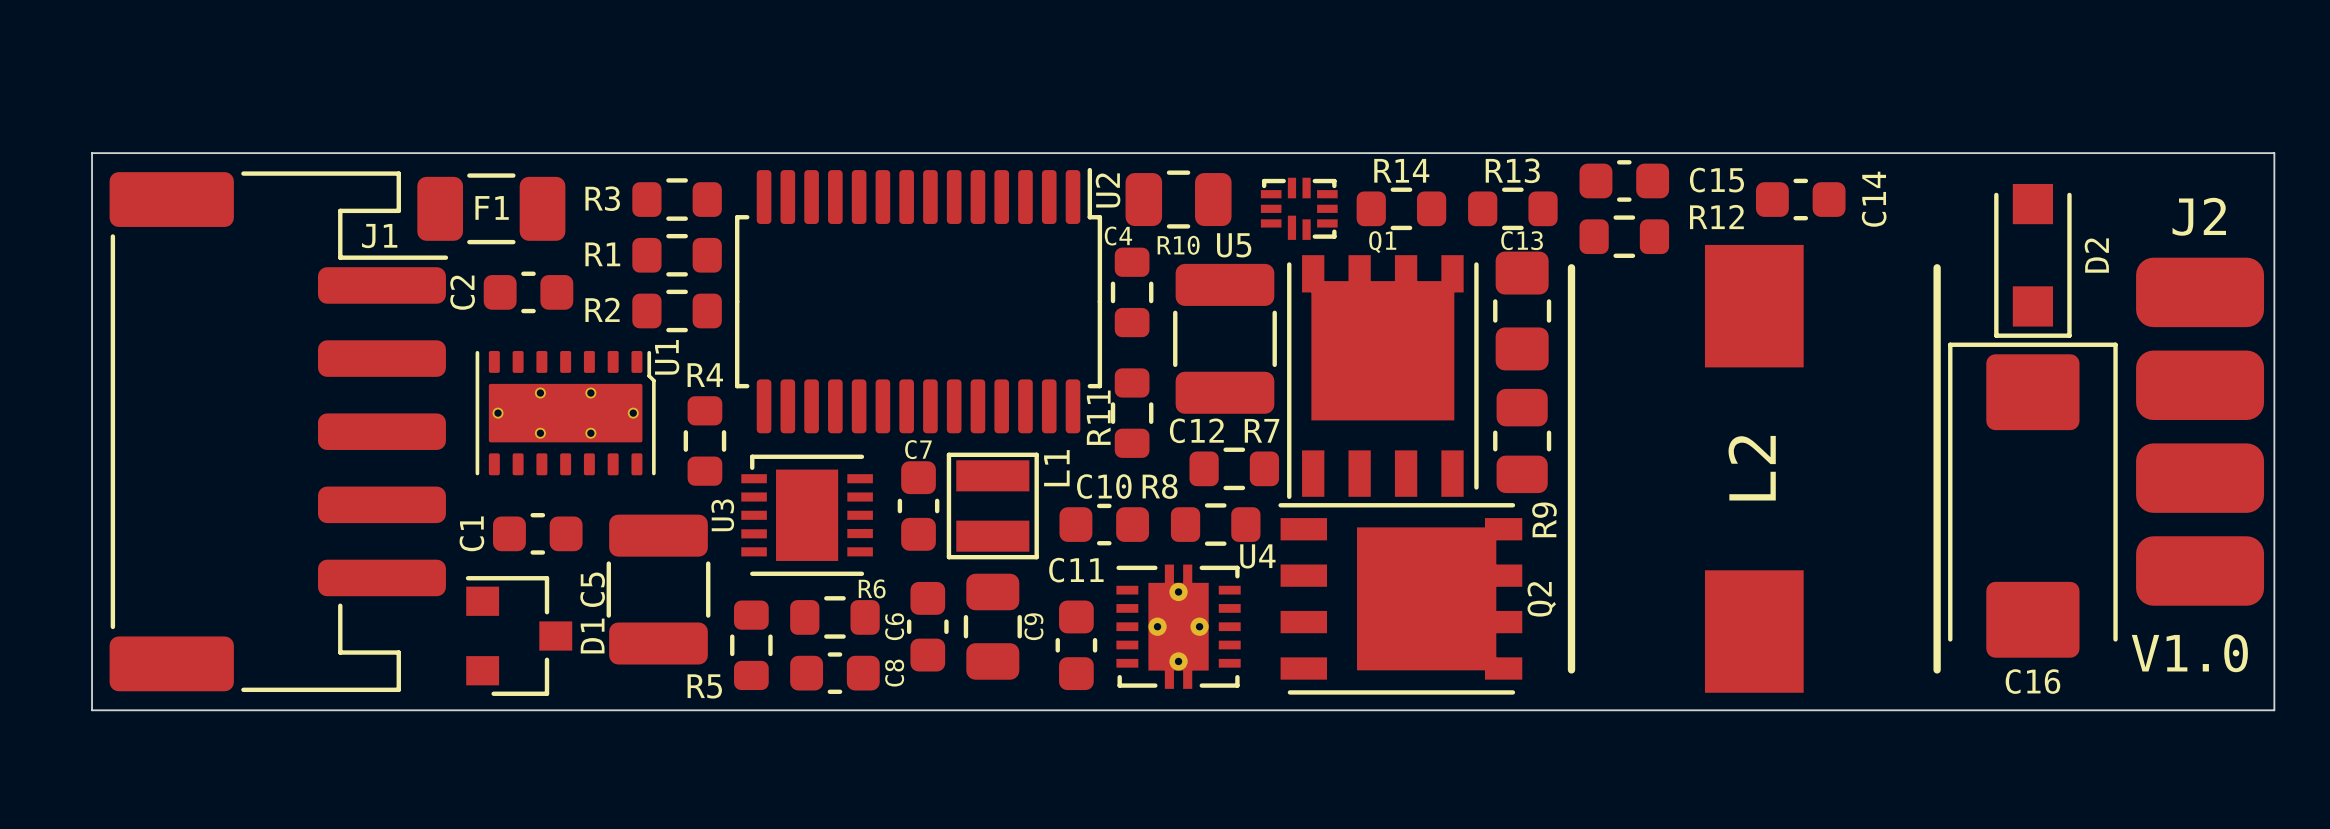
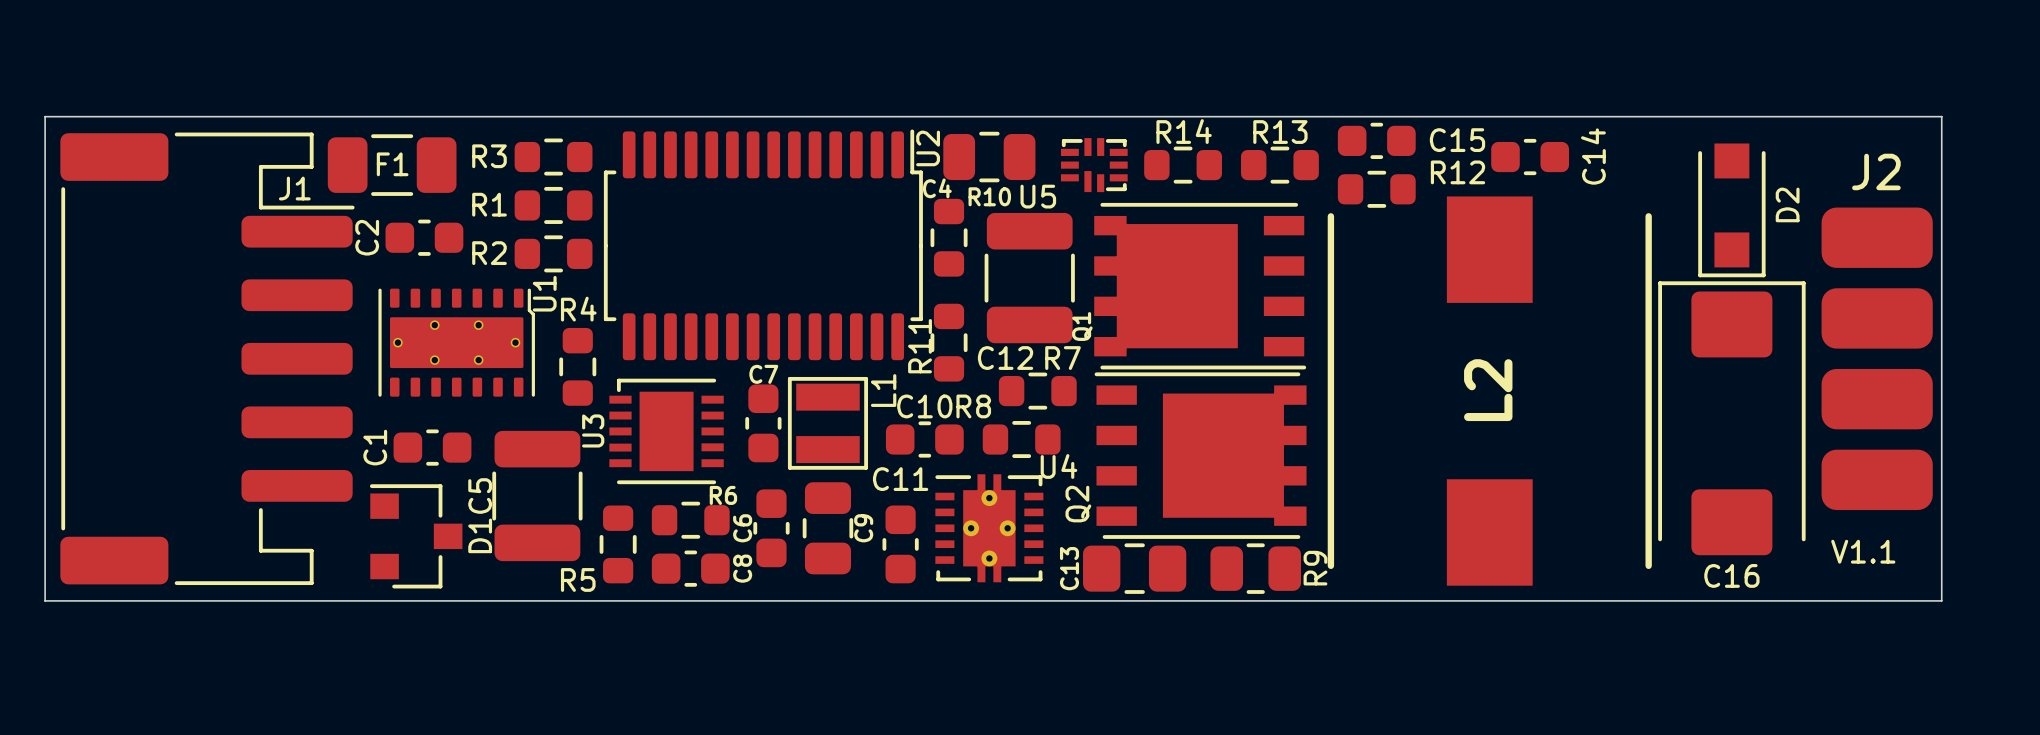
C13 name position: C13 (1522, 240) -> C13 (1069, 568)
C13 rotation: 0° (1522, 310) -> 90° clockwise (1134, 568)
C13 position: (1522, 310) -> (1134, 568)
Q1 rotation: 0° (1382, 377) -> 90° counterclockwise (1200, 286)
R9 rotation: 0° (1522, 440) -> 90° clockwise (1255, 568)
R9 position: (1522, 440) -> (1255, 568)
R9 name position: R9 (1544, 519) -> R9 (1315, 568)
Q2 position: (1400, 598) -> (1200, 455)
Q2 name position: Q2 (1541, 599) -> Q2 (1078, 504)
text: V1.0 (2189, 653) -> V1.1 (1863, 551)

